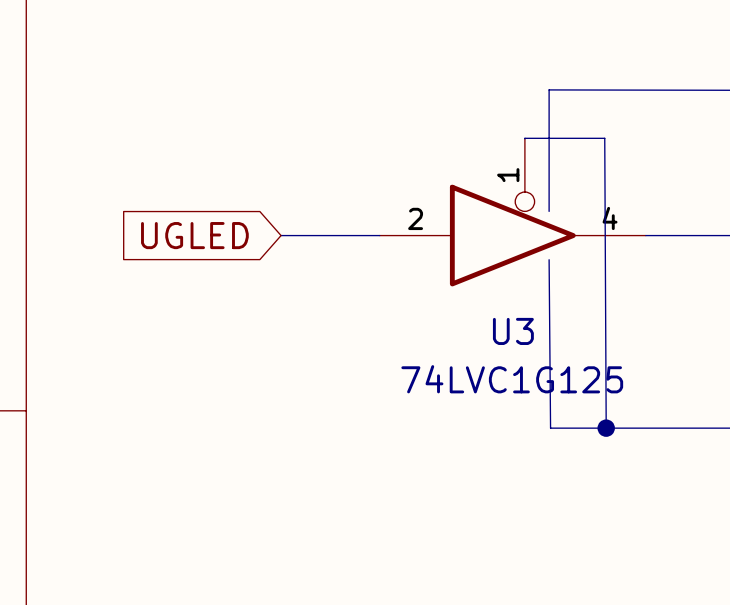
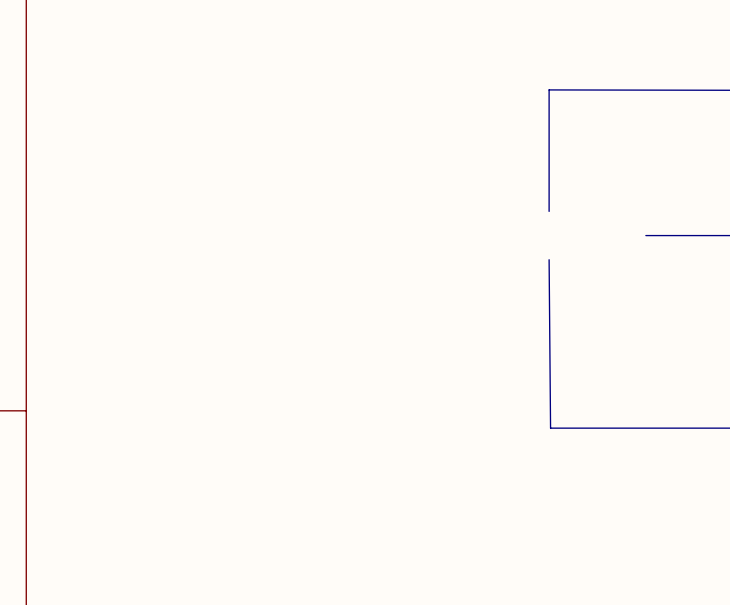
wire: (524, 138) (604, 138) (606, 428) -> none
U3: 74LVC1G125 (512, 212) -> none
global label: UGLED (194, 235) -> none
wire: (281, 235) (379, 235) -> none
junction: (606, 428) -> none

